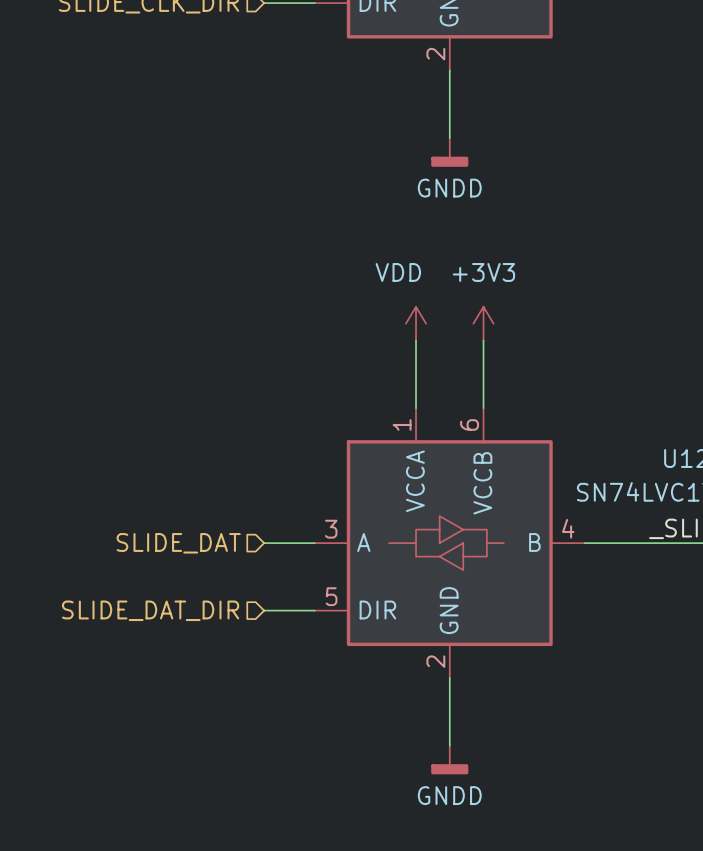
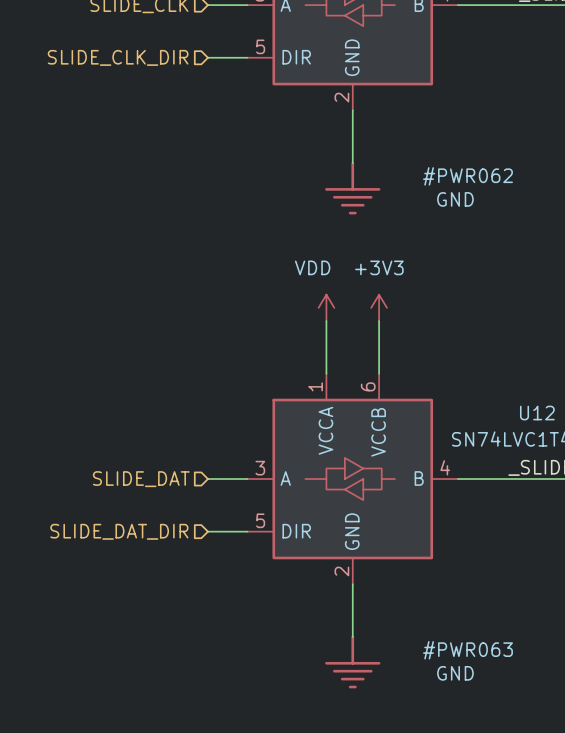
power symbol: GNDD (449, 152) -> none
#PWR062: none -> GND (352, 188)
power symbol: GNDD (449, 759) -> none
#PWR063: none -> GND (352, 661)

